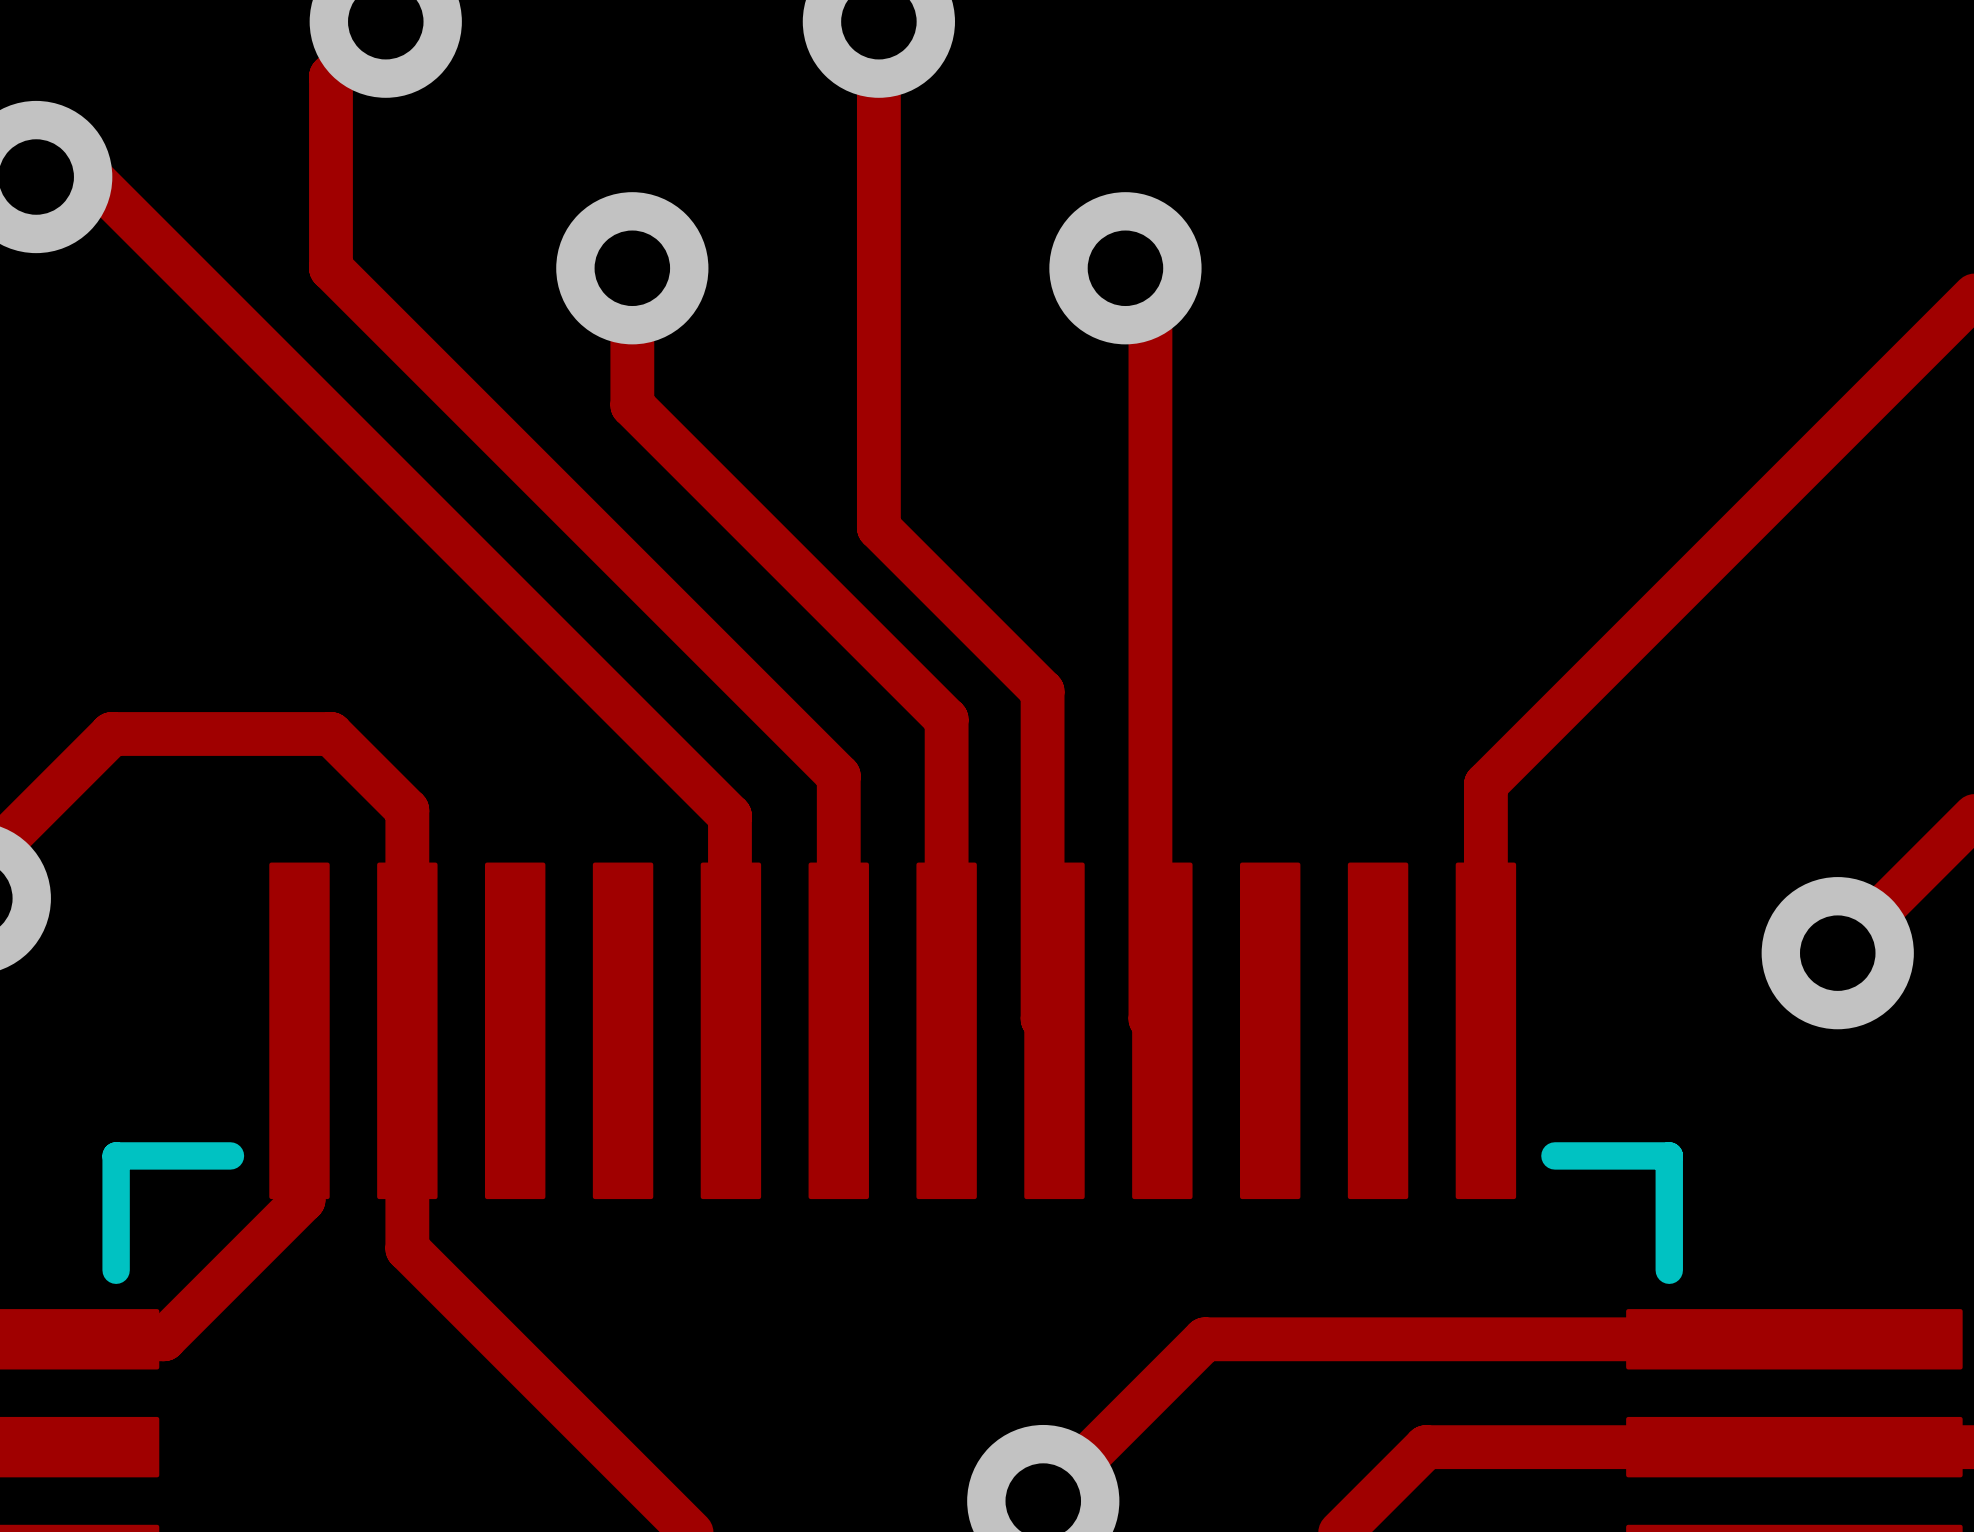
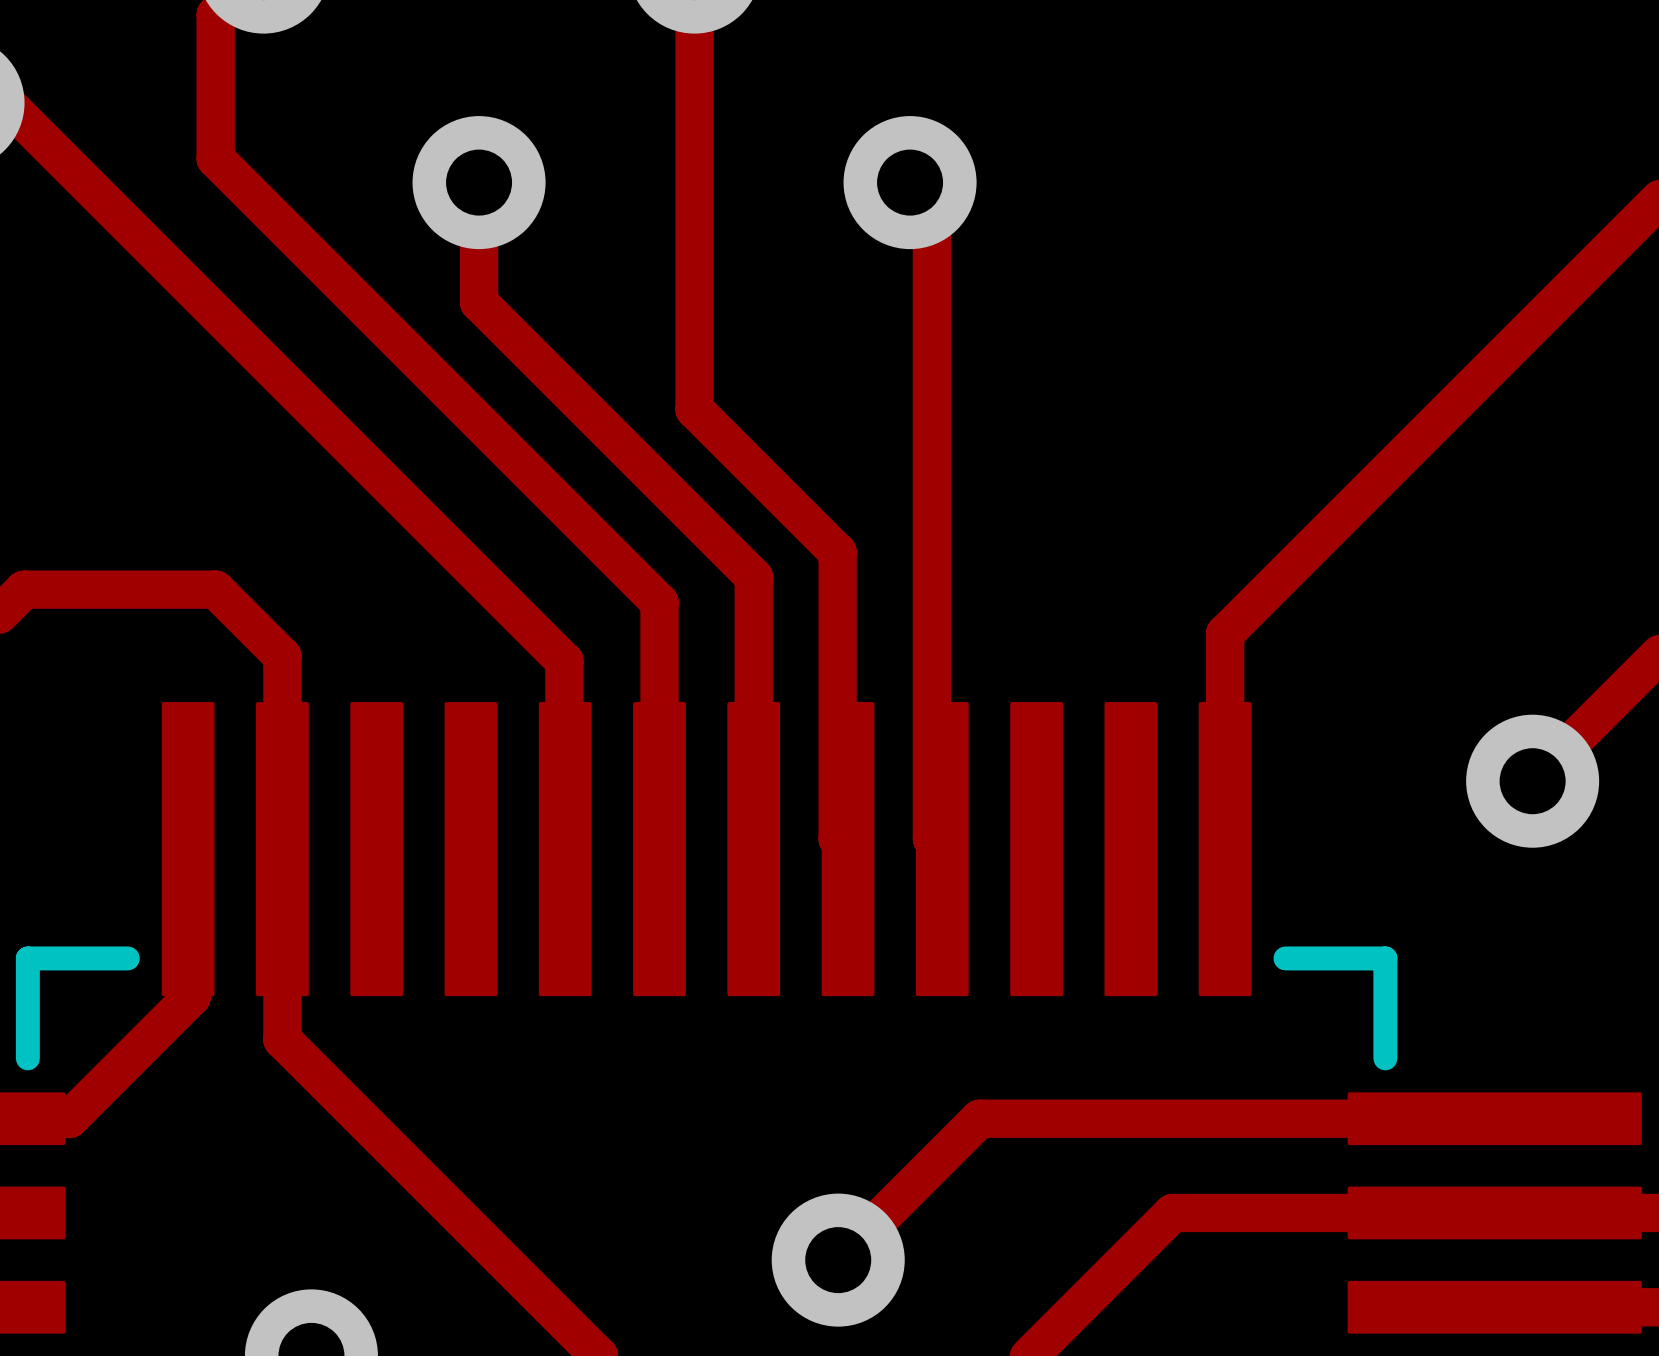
track: (330, 240) (330, 268) (838, 776) -> (215, 158) (659, 602) (659, 626)

